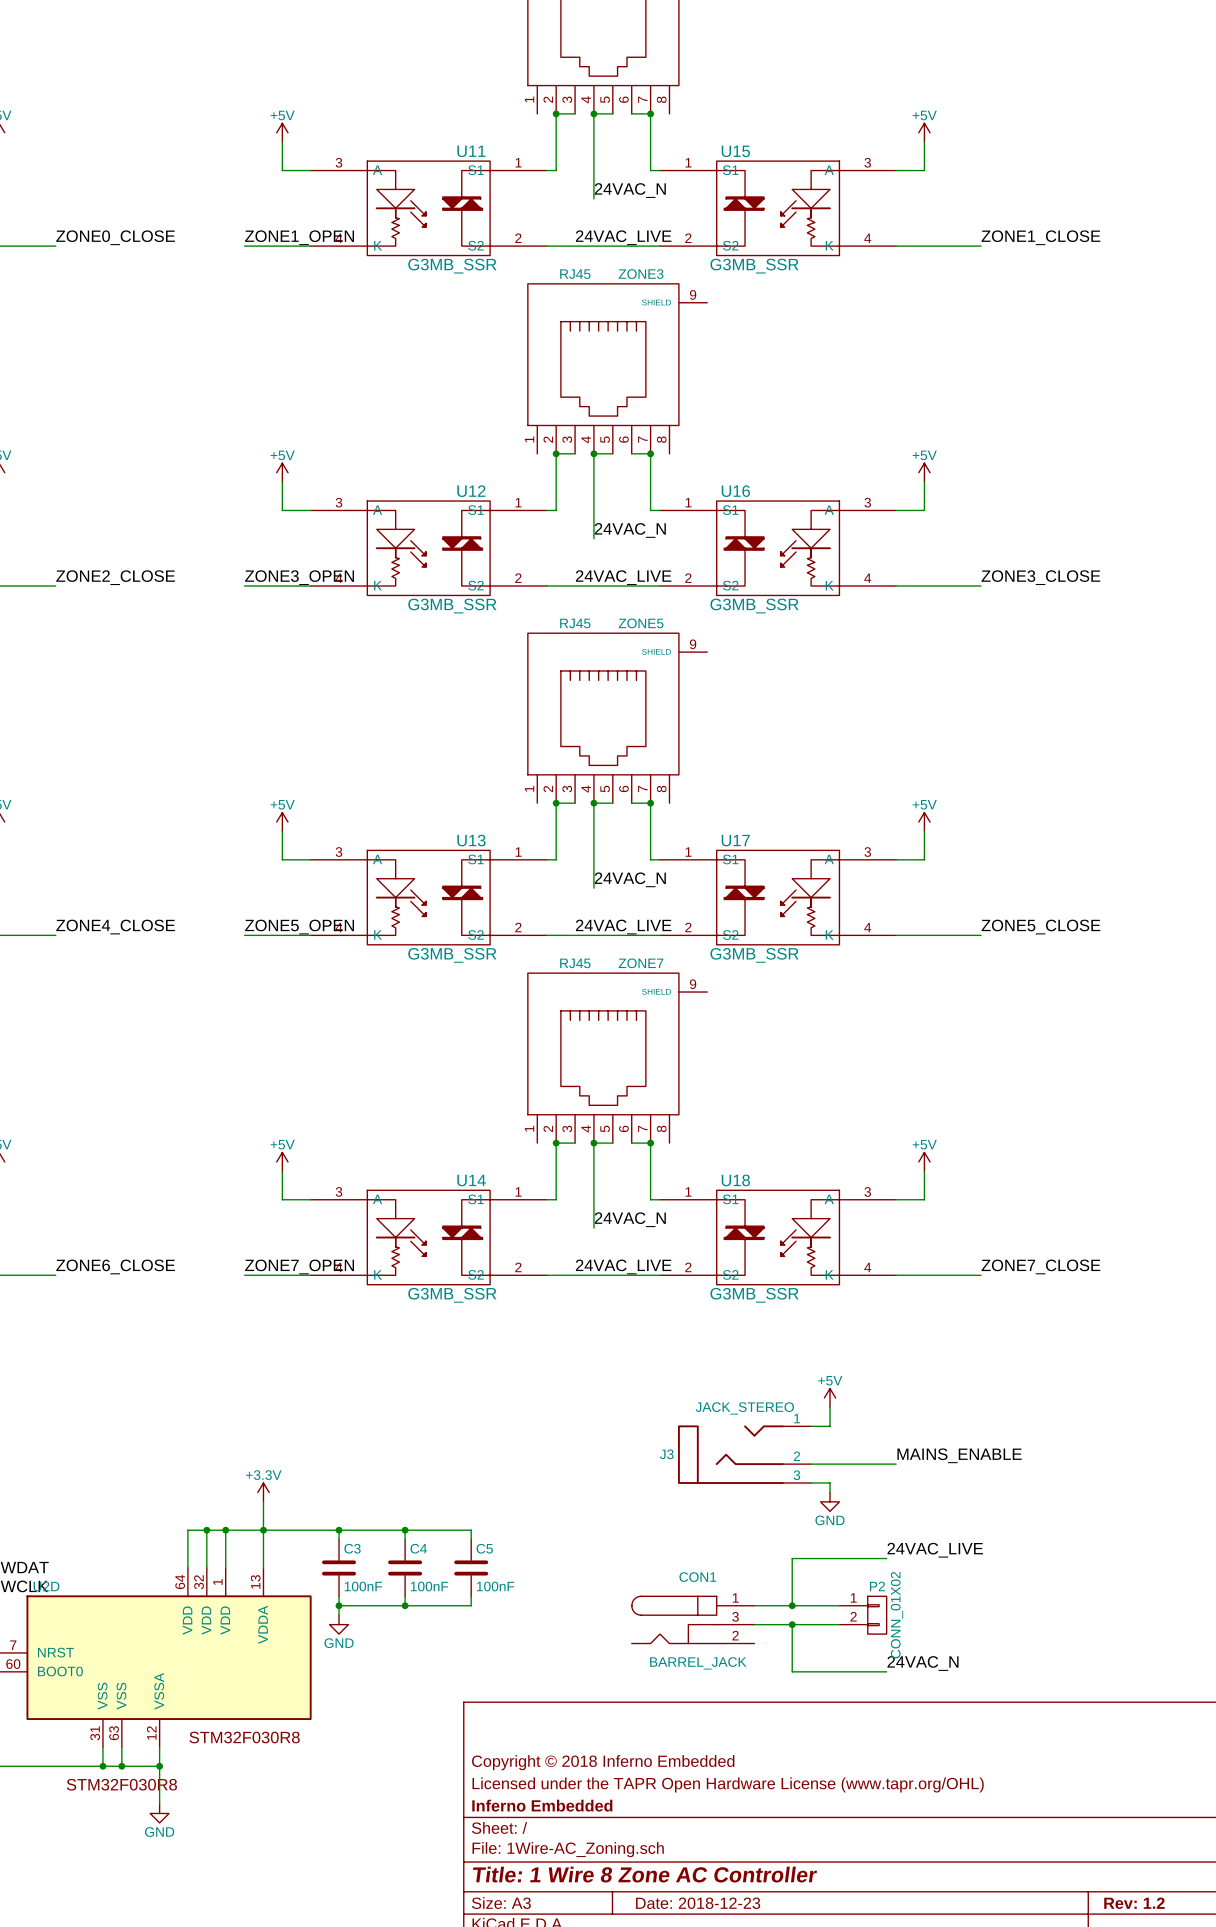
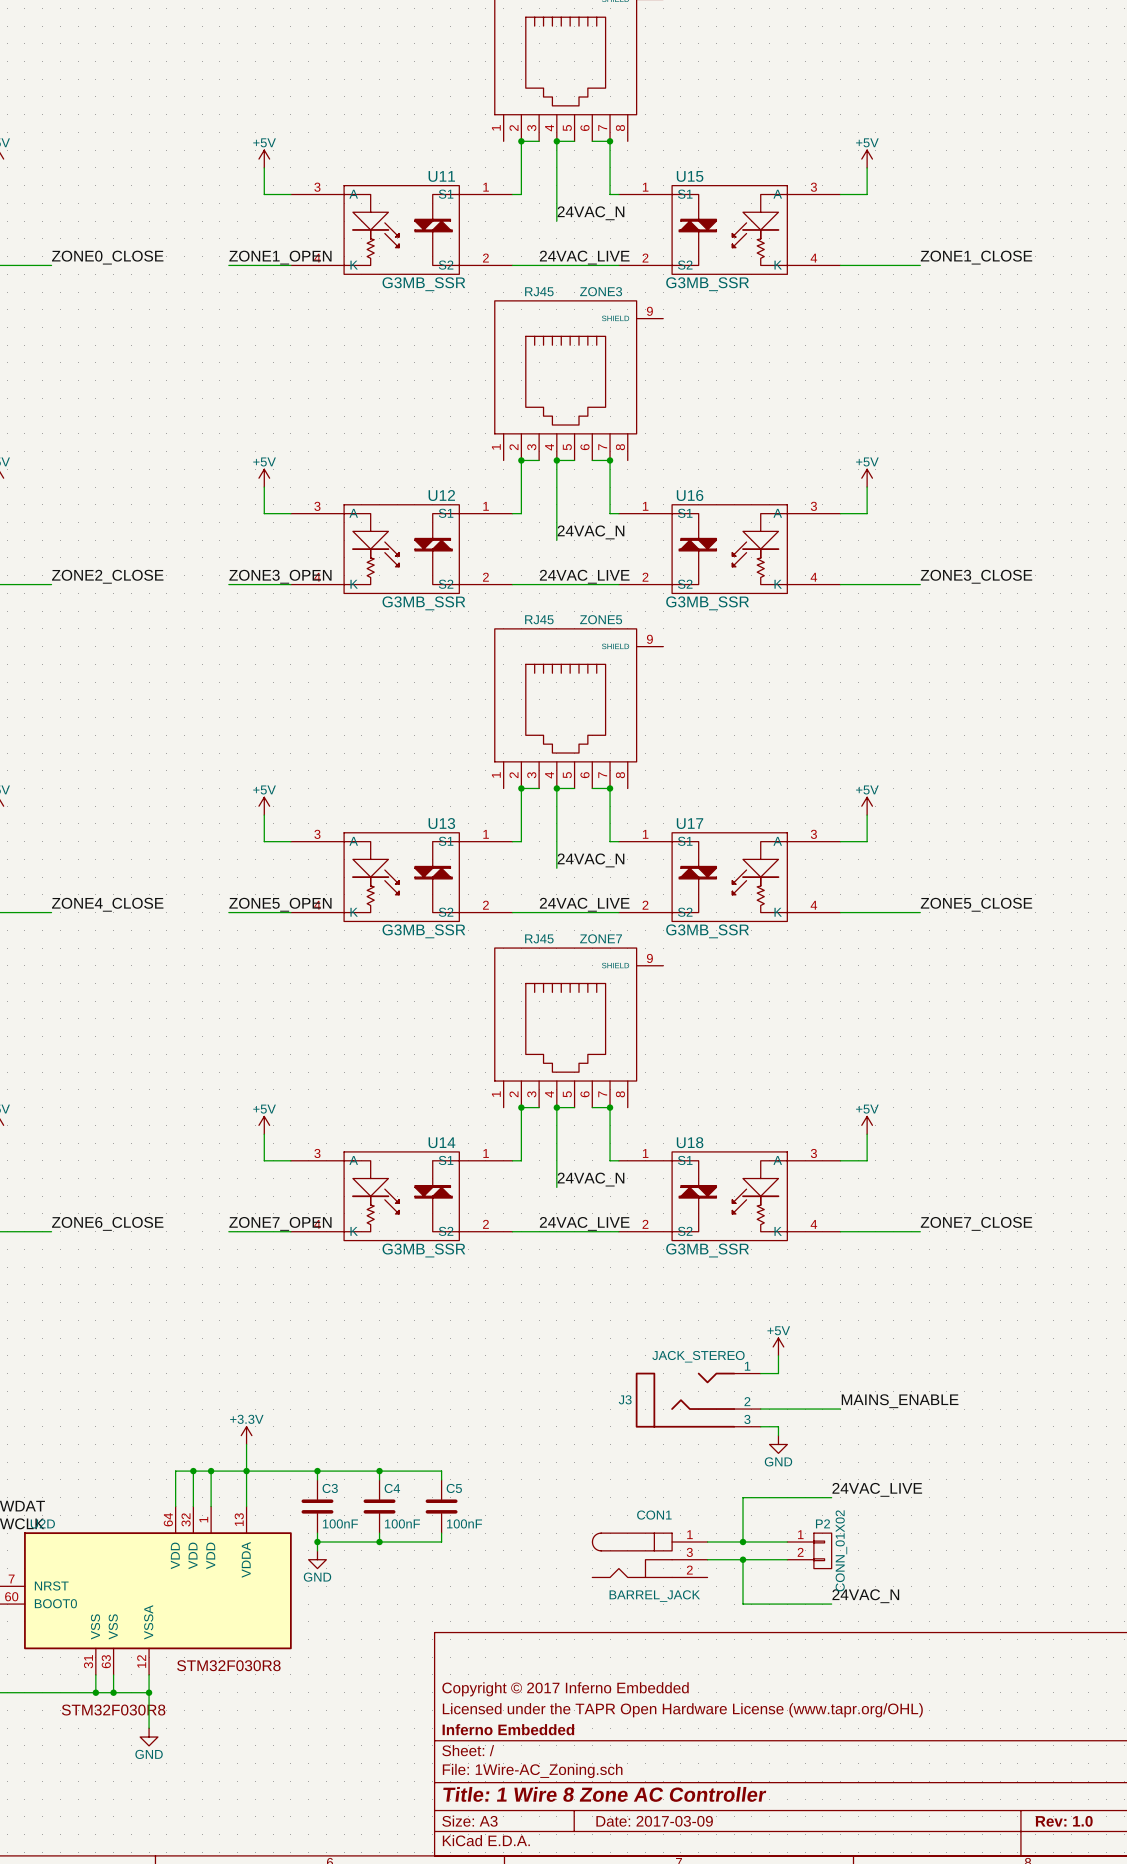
title block: Copyright © 2018 Inferno Embedded (603, 1762) -> Copyright © 2017 Inferno Embedded (565, 1689)
title block: Date: 2018-12-23 (698, 1903) -> Date: 2017-03-09 (654, 1821)
title block: Rev: 1.2 (1134, 1903) -> Rev: 1.0 (1064, 1821)

